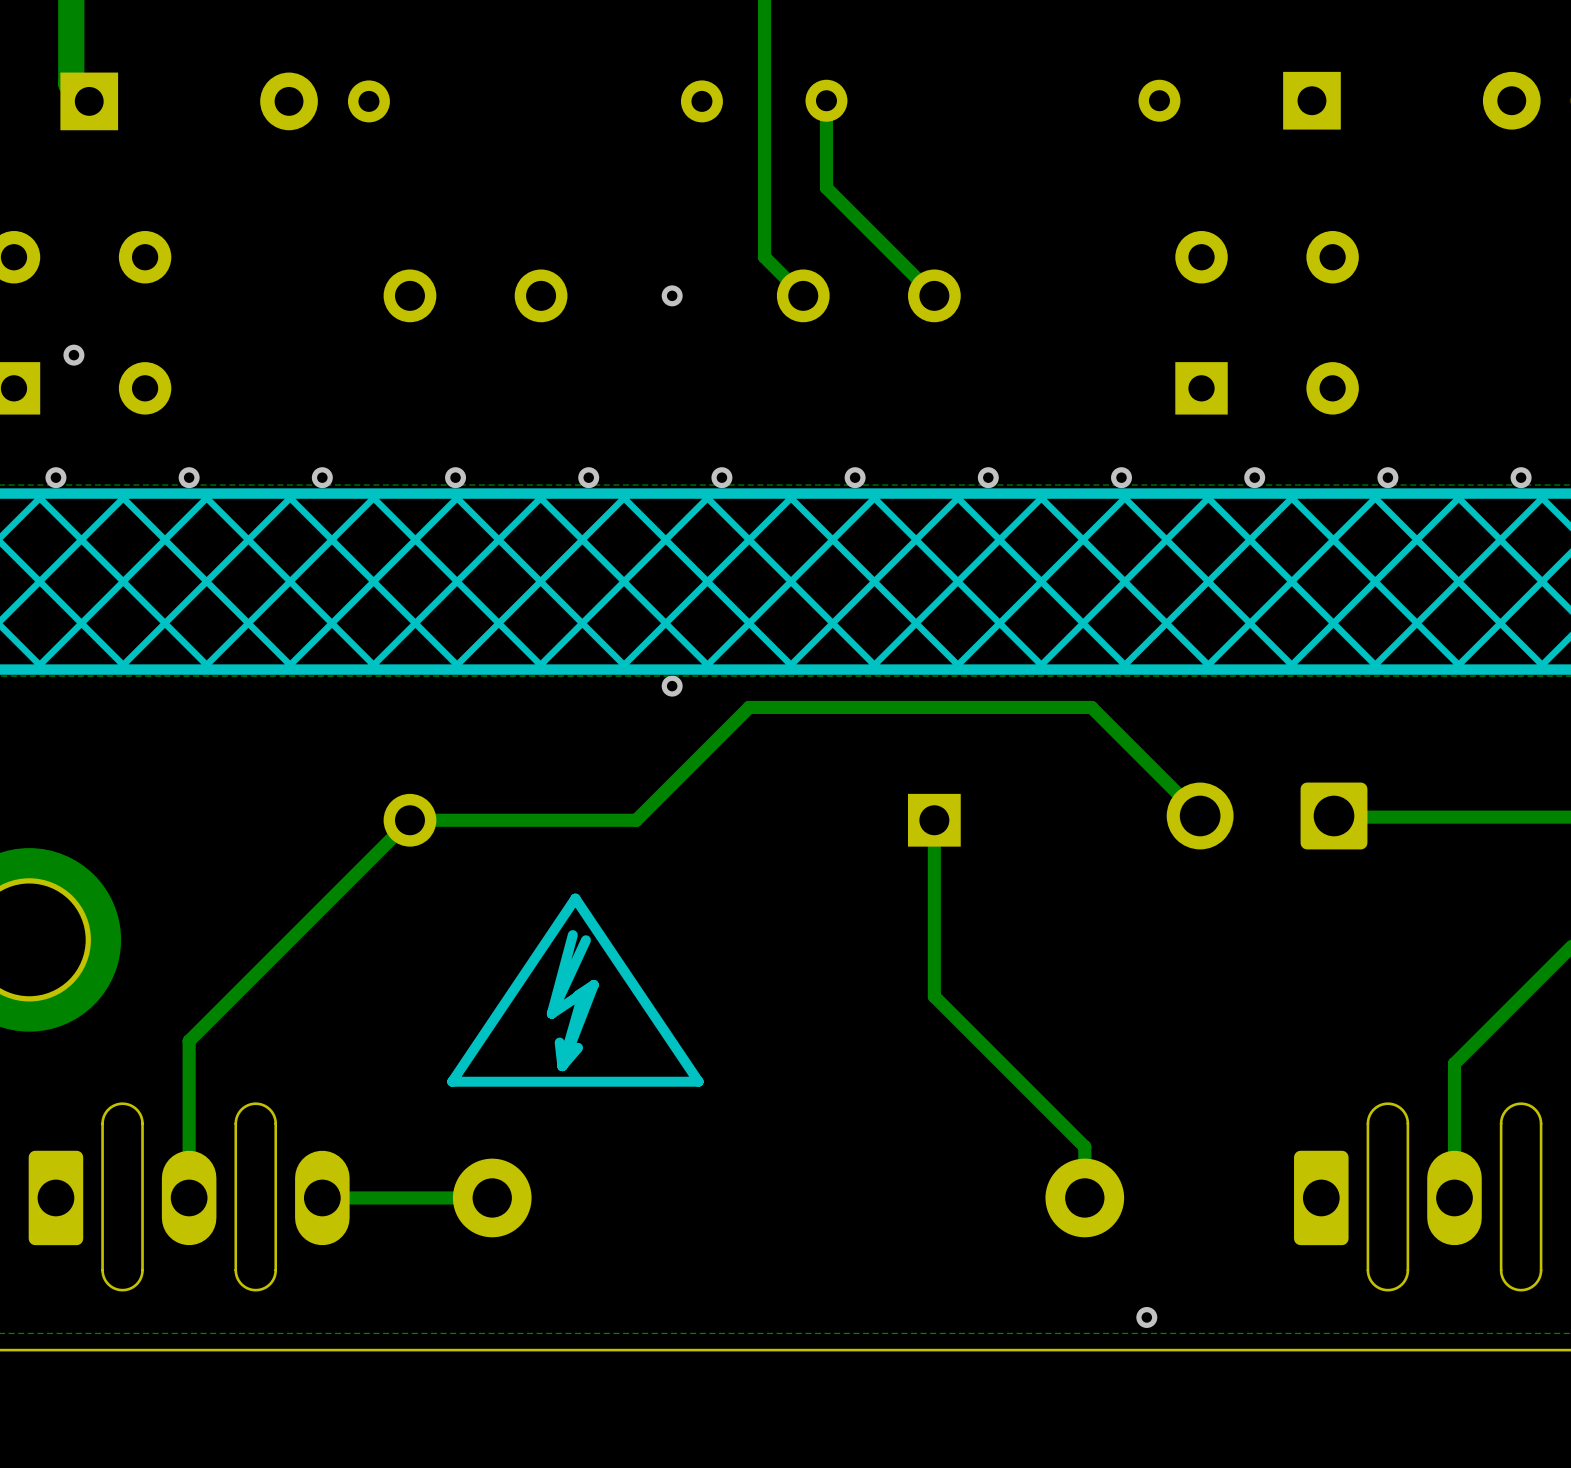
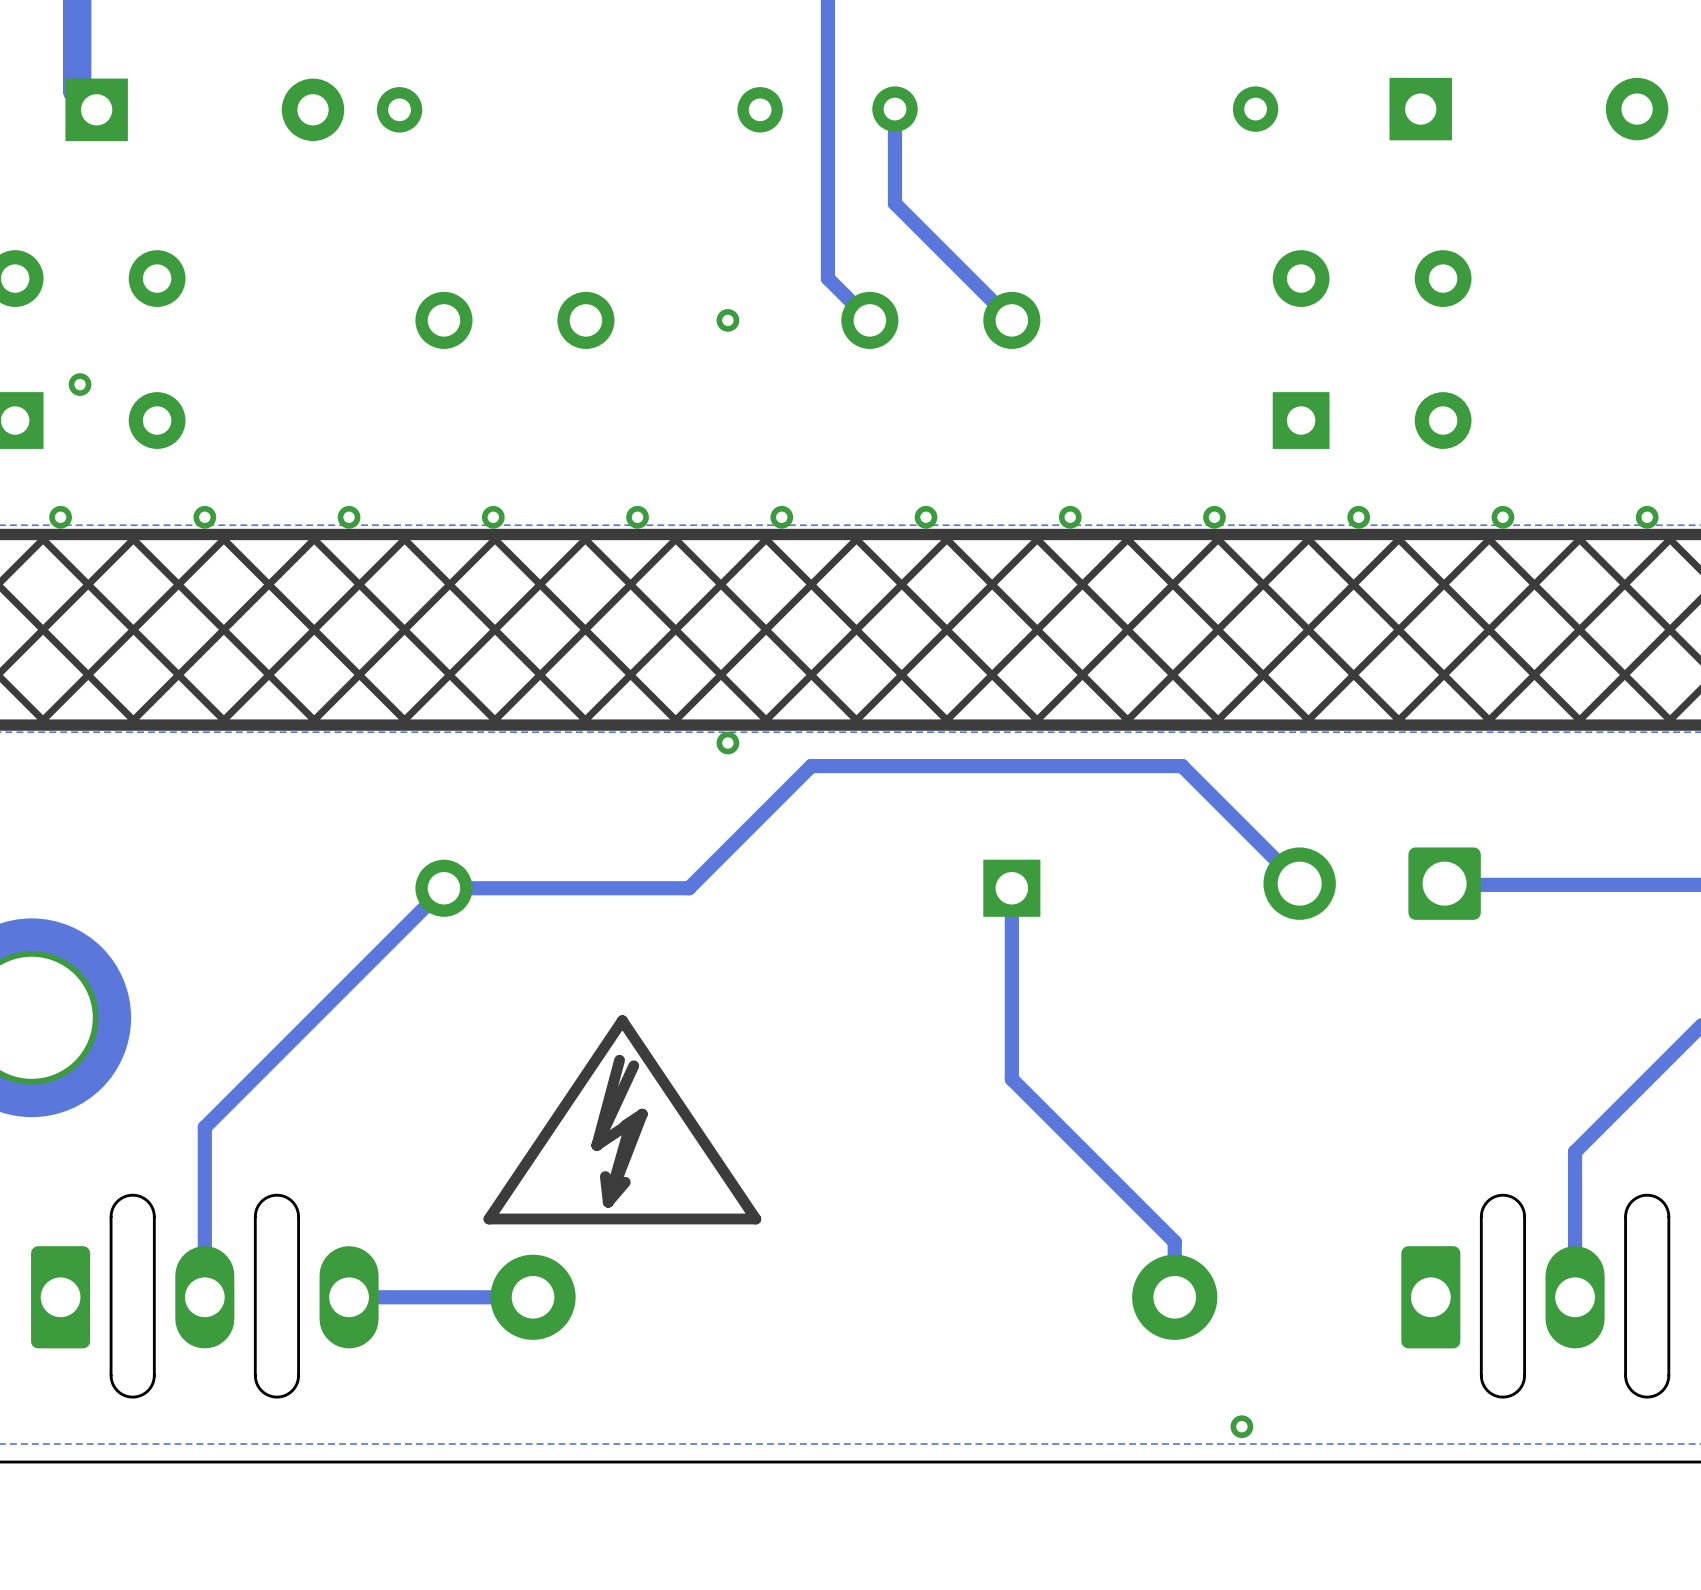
drawing position: (575, 990) -> (622, 1119)

